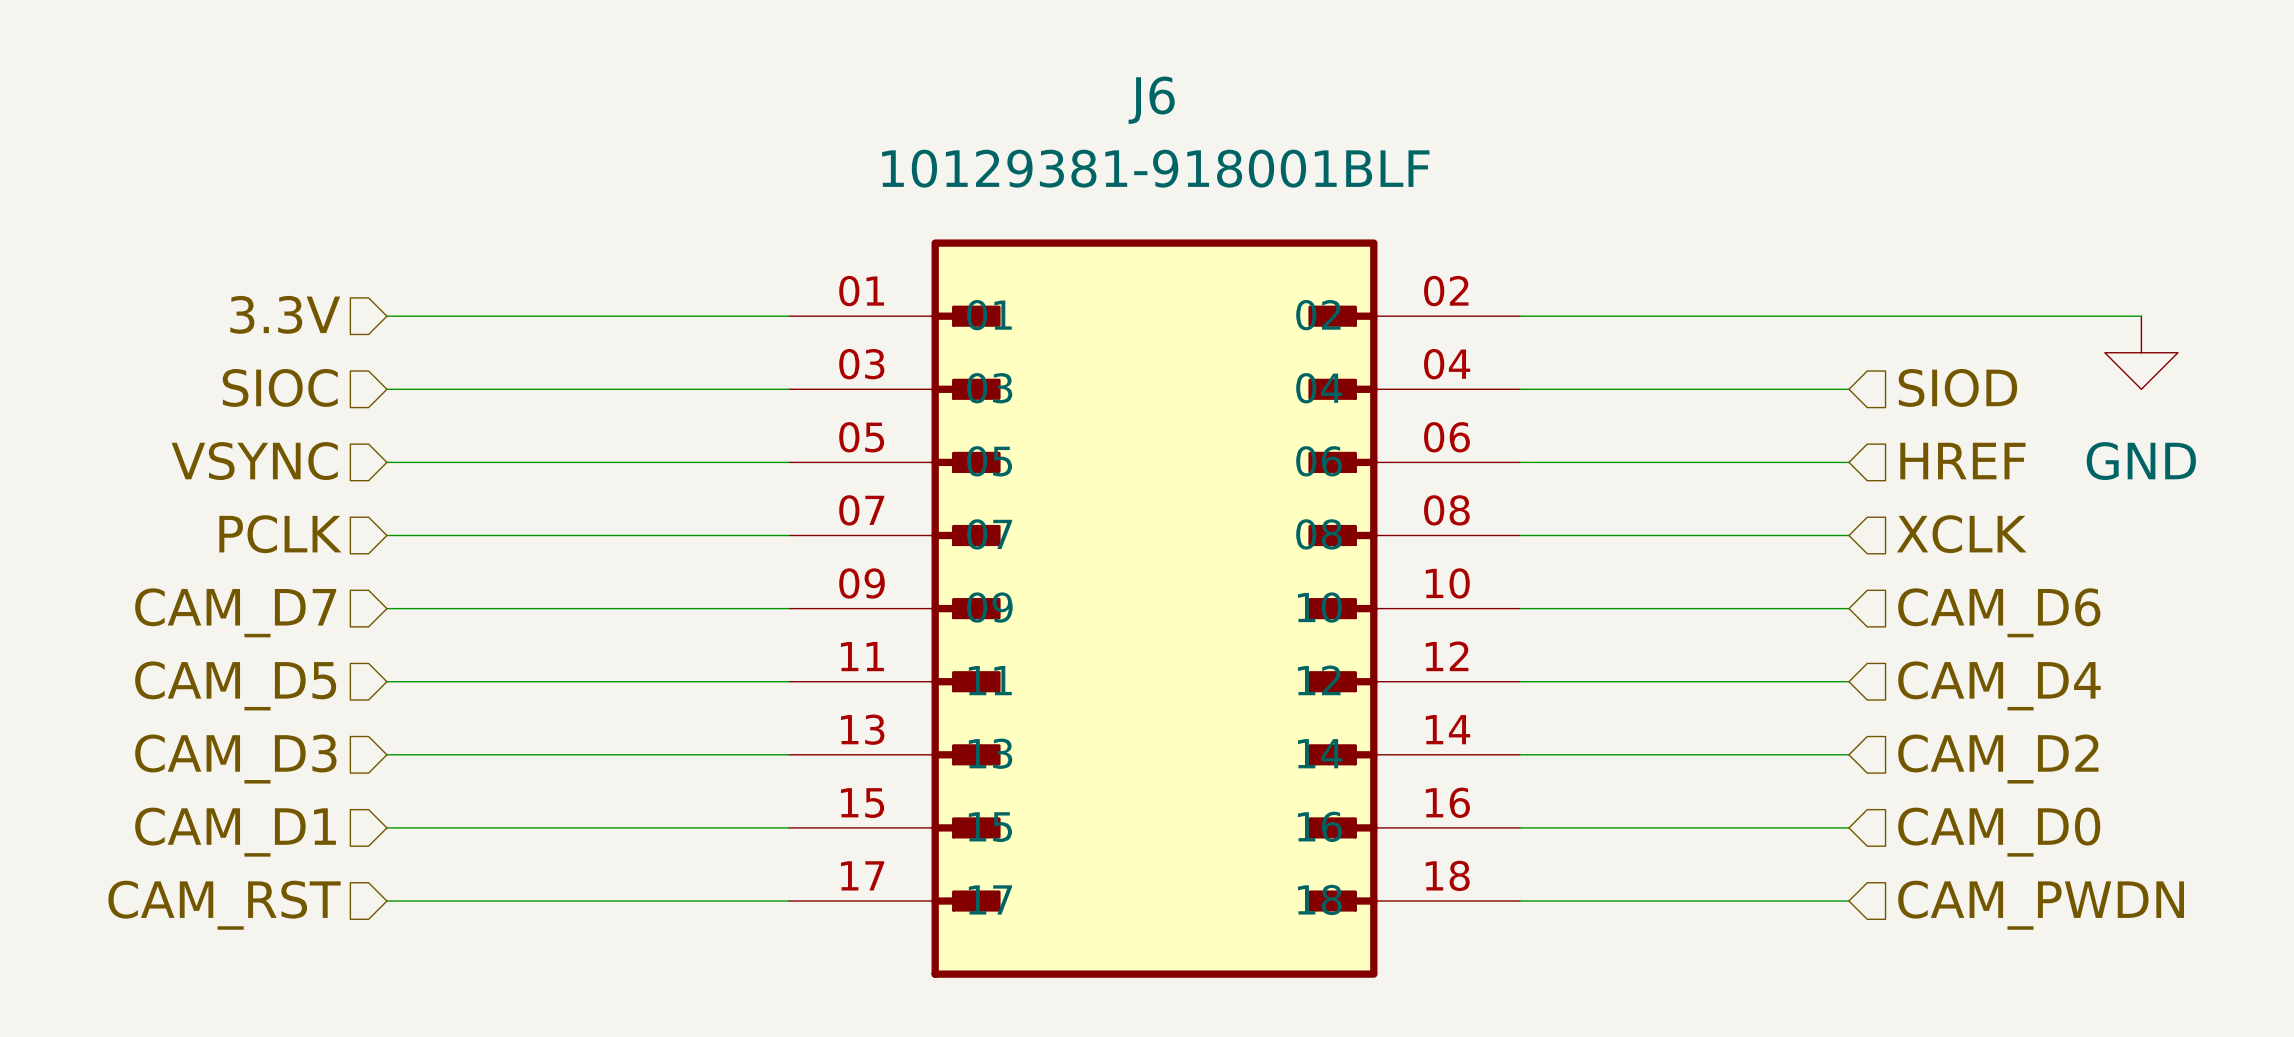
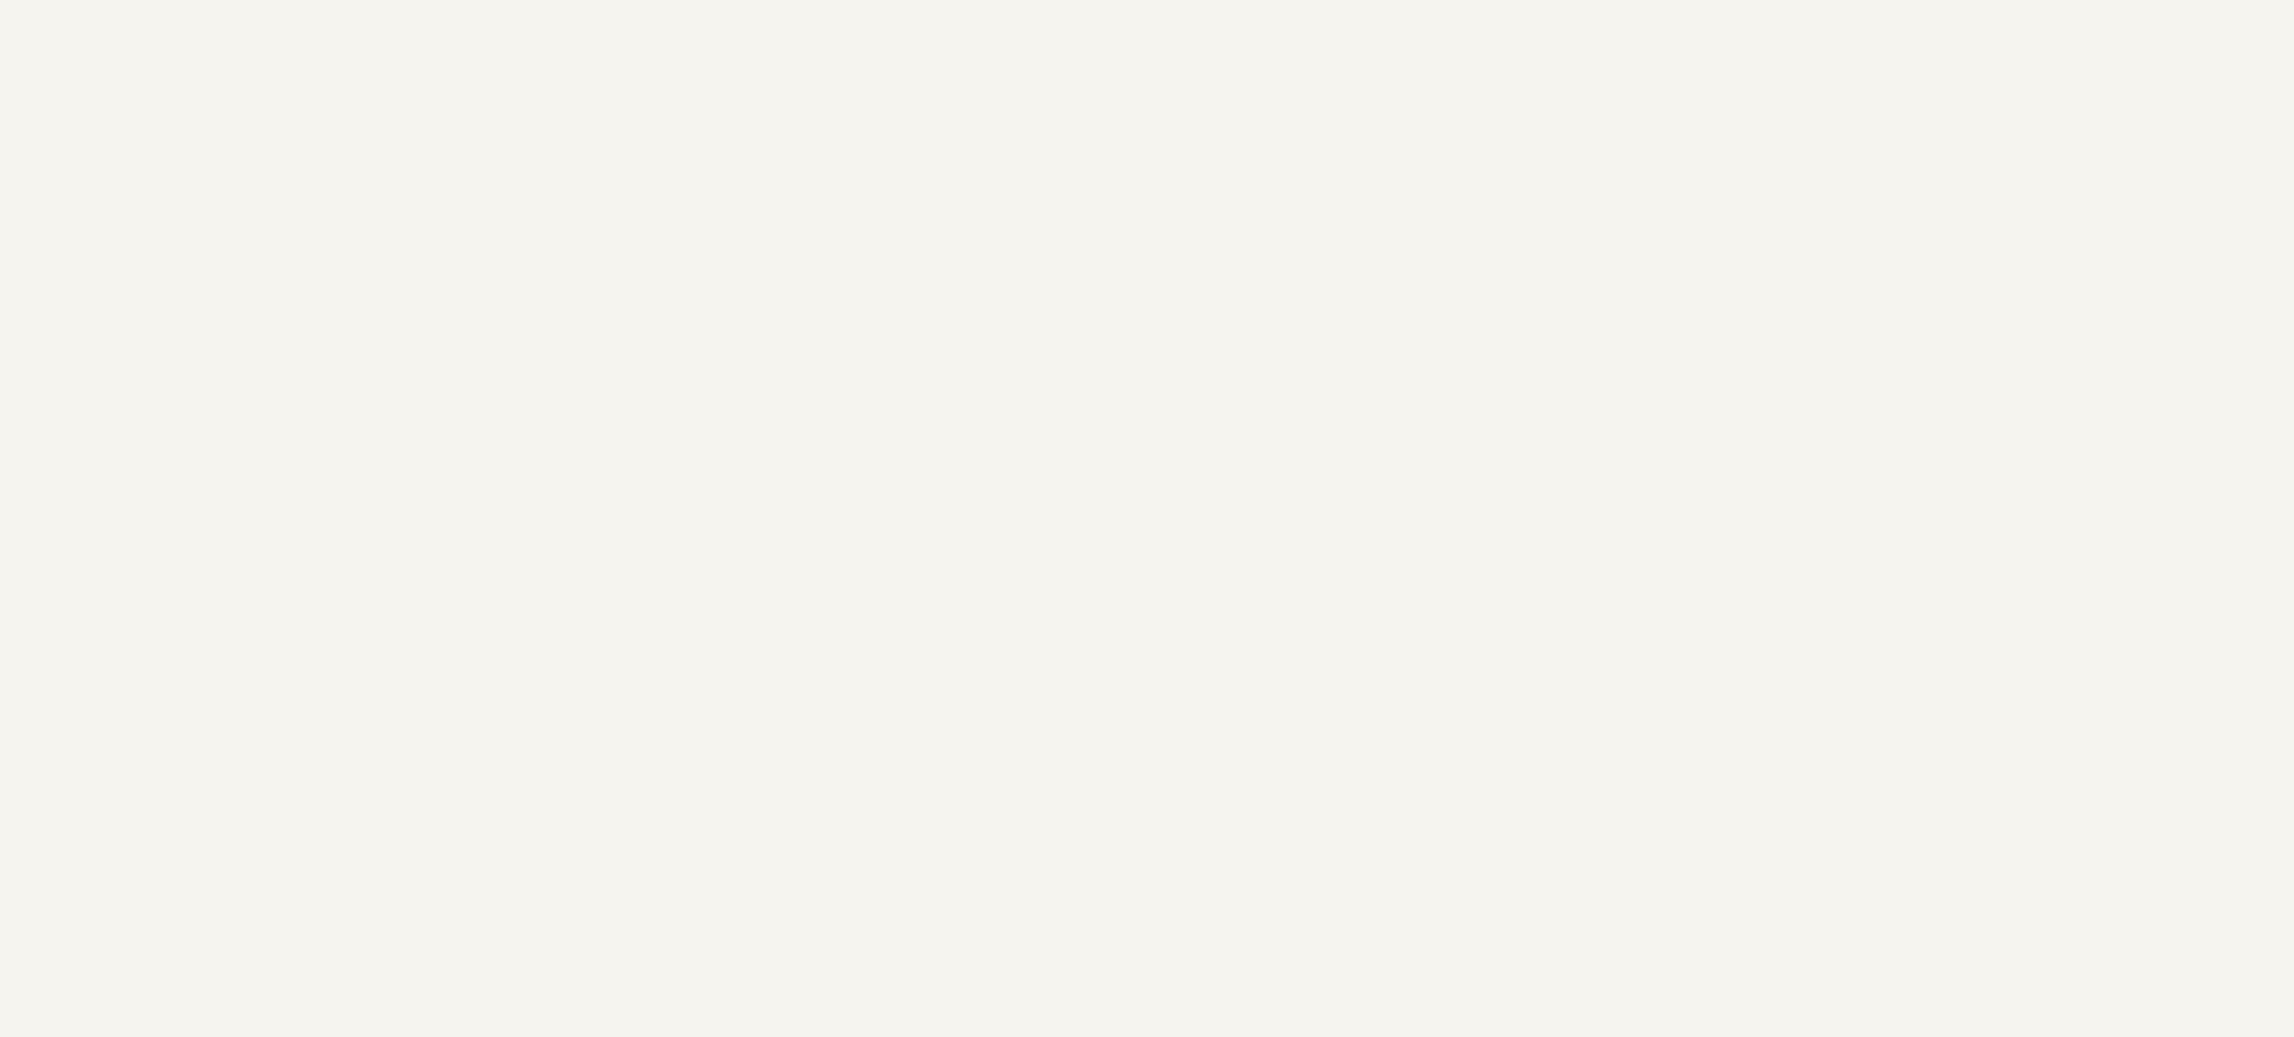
hierarchical label: 3.3V (285, 314) -> none
wire: (386, 316) (788, 316) -> none
wire: (1520, 316) (2141, 316) -> none
power symbol: GND (2141, 352) -> none
hierarchical label: SIOC (280, 387) -> none
hierarchical label: SIOD (1957, 387) -> none
wire: (386, 389) (788, 389) -> none
wire: (1520, 389) (1848, 389) -> none
hierarchical label: VSYNC (254, 461) -> none
hierarchical label: HREF (1962, 461) -> none
wire: (386, 462) (788, 462) -> none
wire: (1520, 462) (1848, 462) -> none
hierarchical label: PCLK (280, 534) -> none
hierarchical label: XCLK (1961, 534) -> none
wire: (386, 535) (788, 535) -> none
wire: (1520, 535) (1848, 535) -> none
wire: (386, 608) (788, 608) -> none
J6: 10129381-918001BLF (1154, 608) -> none
wire: (1520, 608) (1848, 608) -> none
hierarchical label: CAM_D7 (235, 612) -> none
hierarchical label: CAM_D6 (1999, 612) -> none
wire: (386, 681) (788, 681) -> none
wire: (1520, 681) (1848, 681) -> none
hierarchical label: CAM_D5 (235, 685) -> none
hierarchical label: CAM_D4 (1999, 685) -> none
wire: (386, 754) (788, 754) -> none
wire: (1520, 754) (1848, 754) -> none
hierarchical label: CAM_D3 (235, 759) -> none
hierarchical label: CAM_D2 (1998, 759) -> none
wire: (386, 827) (788, 827) -> none
wire: (1520, 827) (1848, 827) -> none
hierarchical label: CAM_D1 (235, 832) -> none
hierarchical label: CAM_D0 (1999, 832) -> none
wire: (386, 901) (788, 901) -> none
wire: (1520, 901) (1848, 901) -> none
hierarchical label: CAM_RST (224, 905) -> none
hierarchical label: CAM_PWDN (2041, 905) -> none

